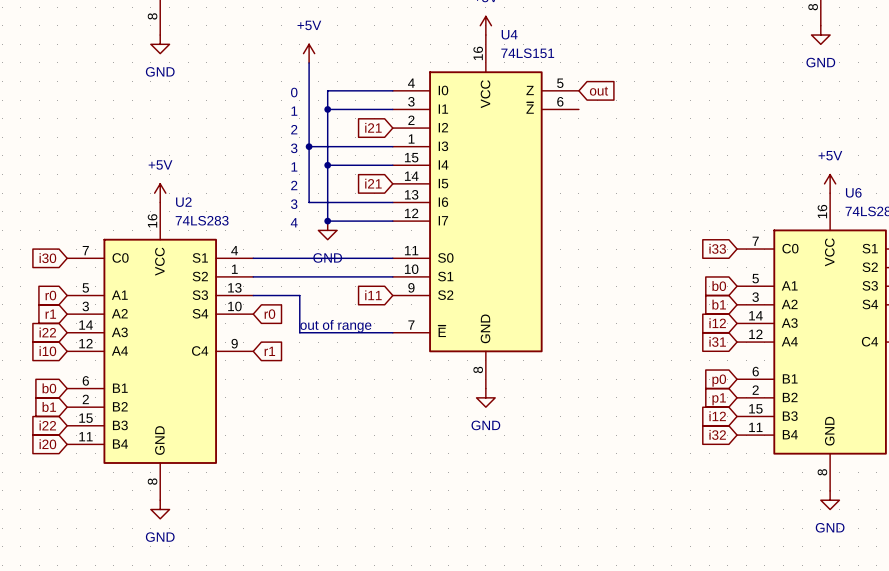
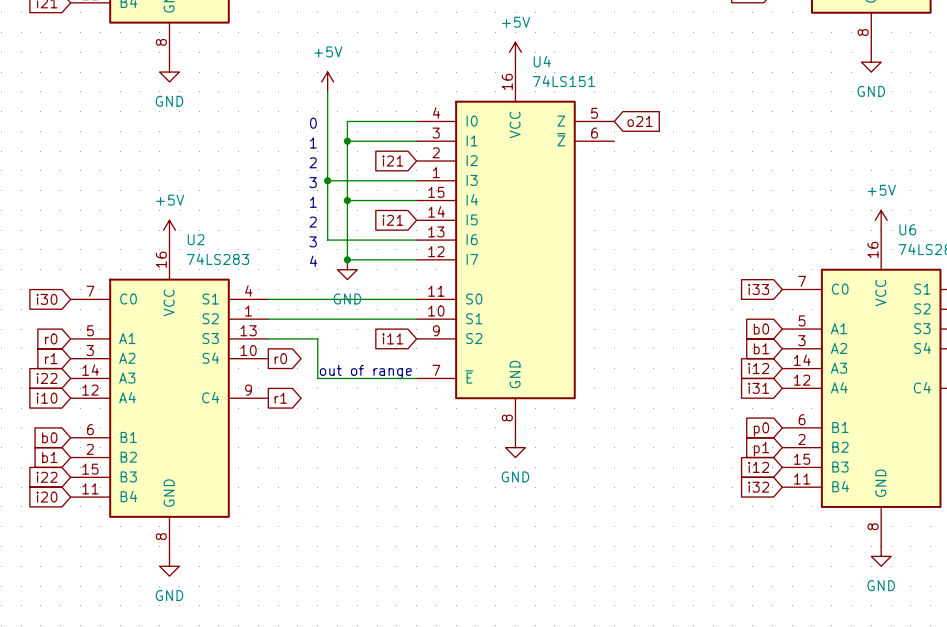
global label: out (599, 91) -> o21 (640, 121)
global label shape: input (269, 314) -> output (280, 358)
global label shape: input (269, 351) -> output (280, 398)

